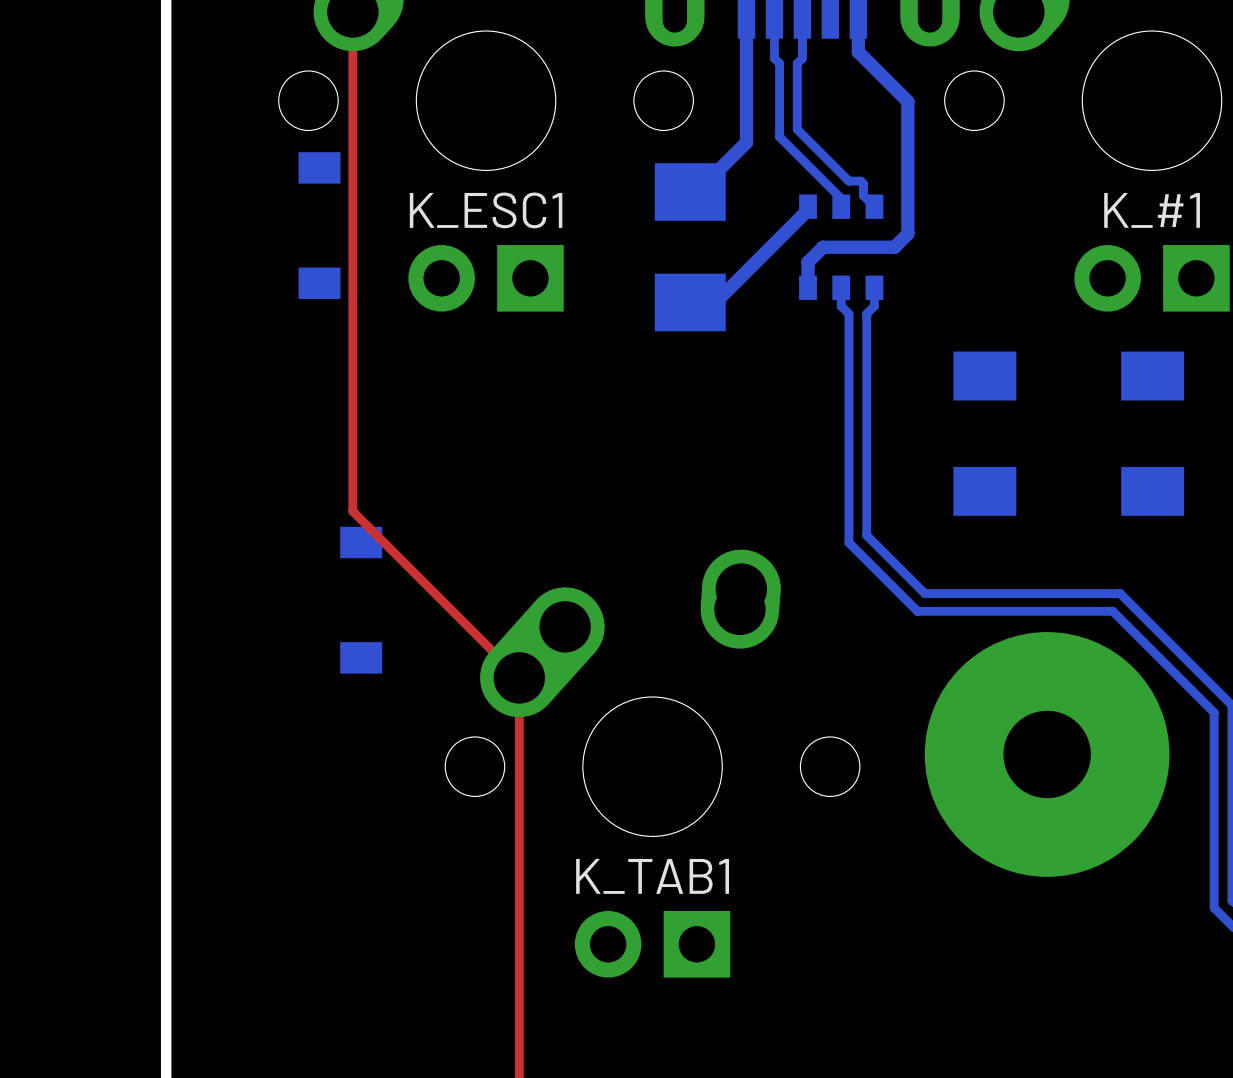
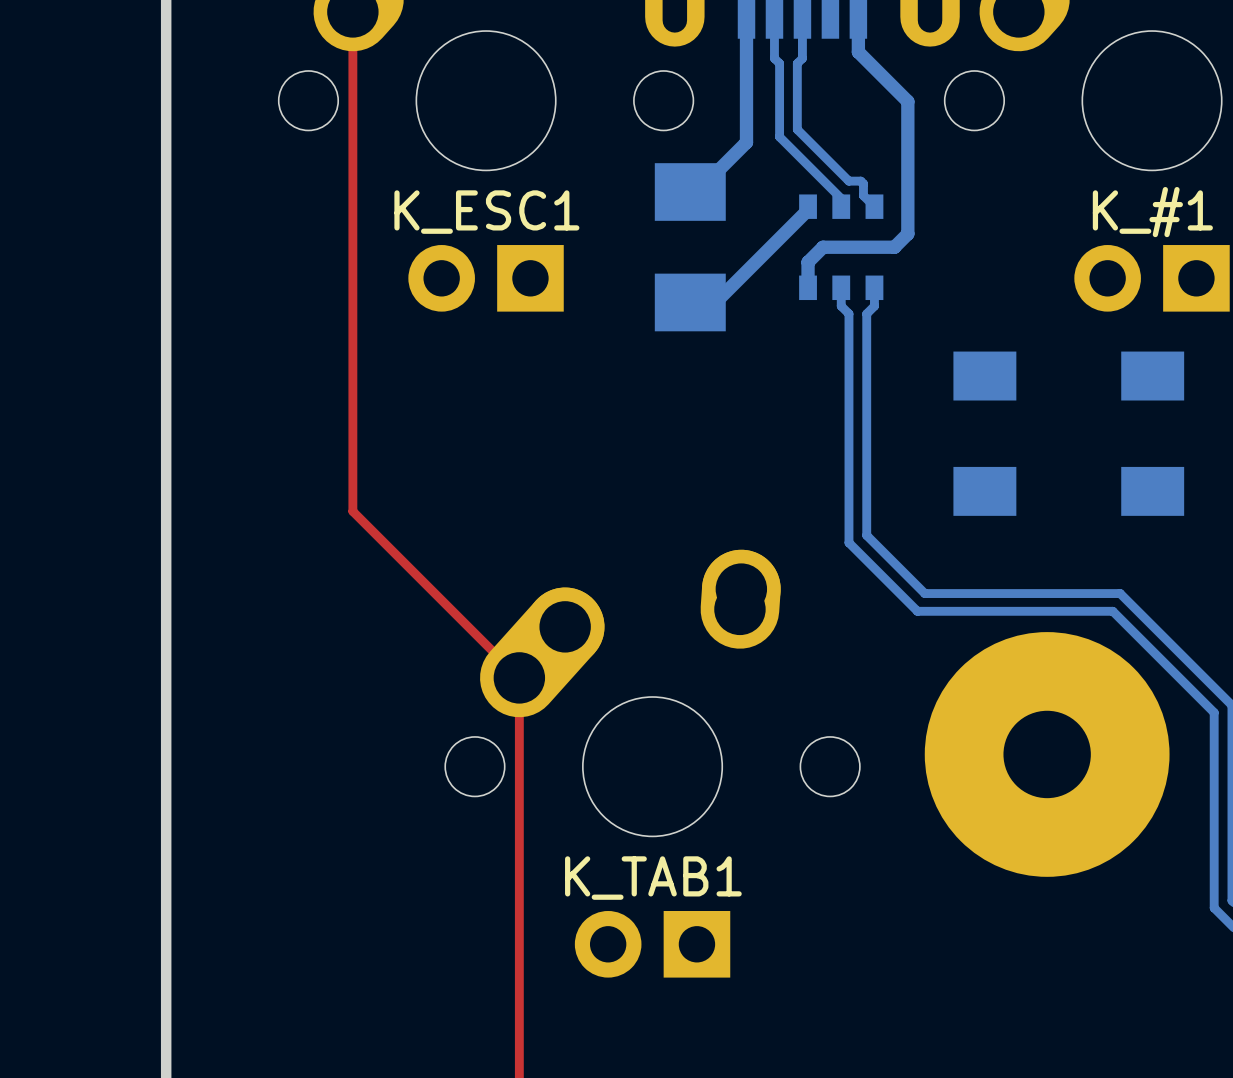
part: (319, 225) -> none
part: (361, 600) -> none

